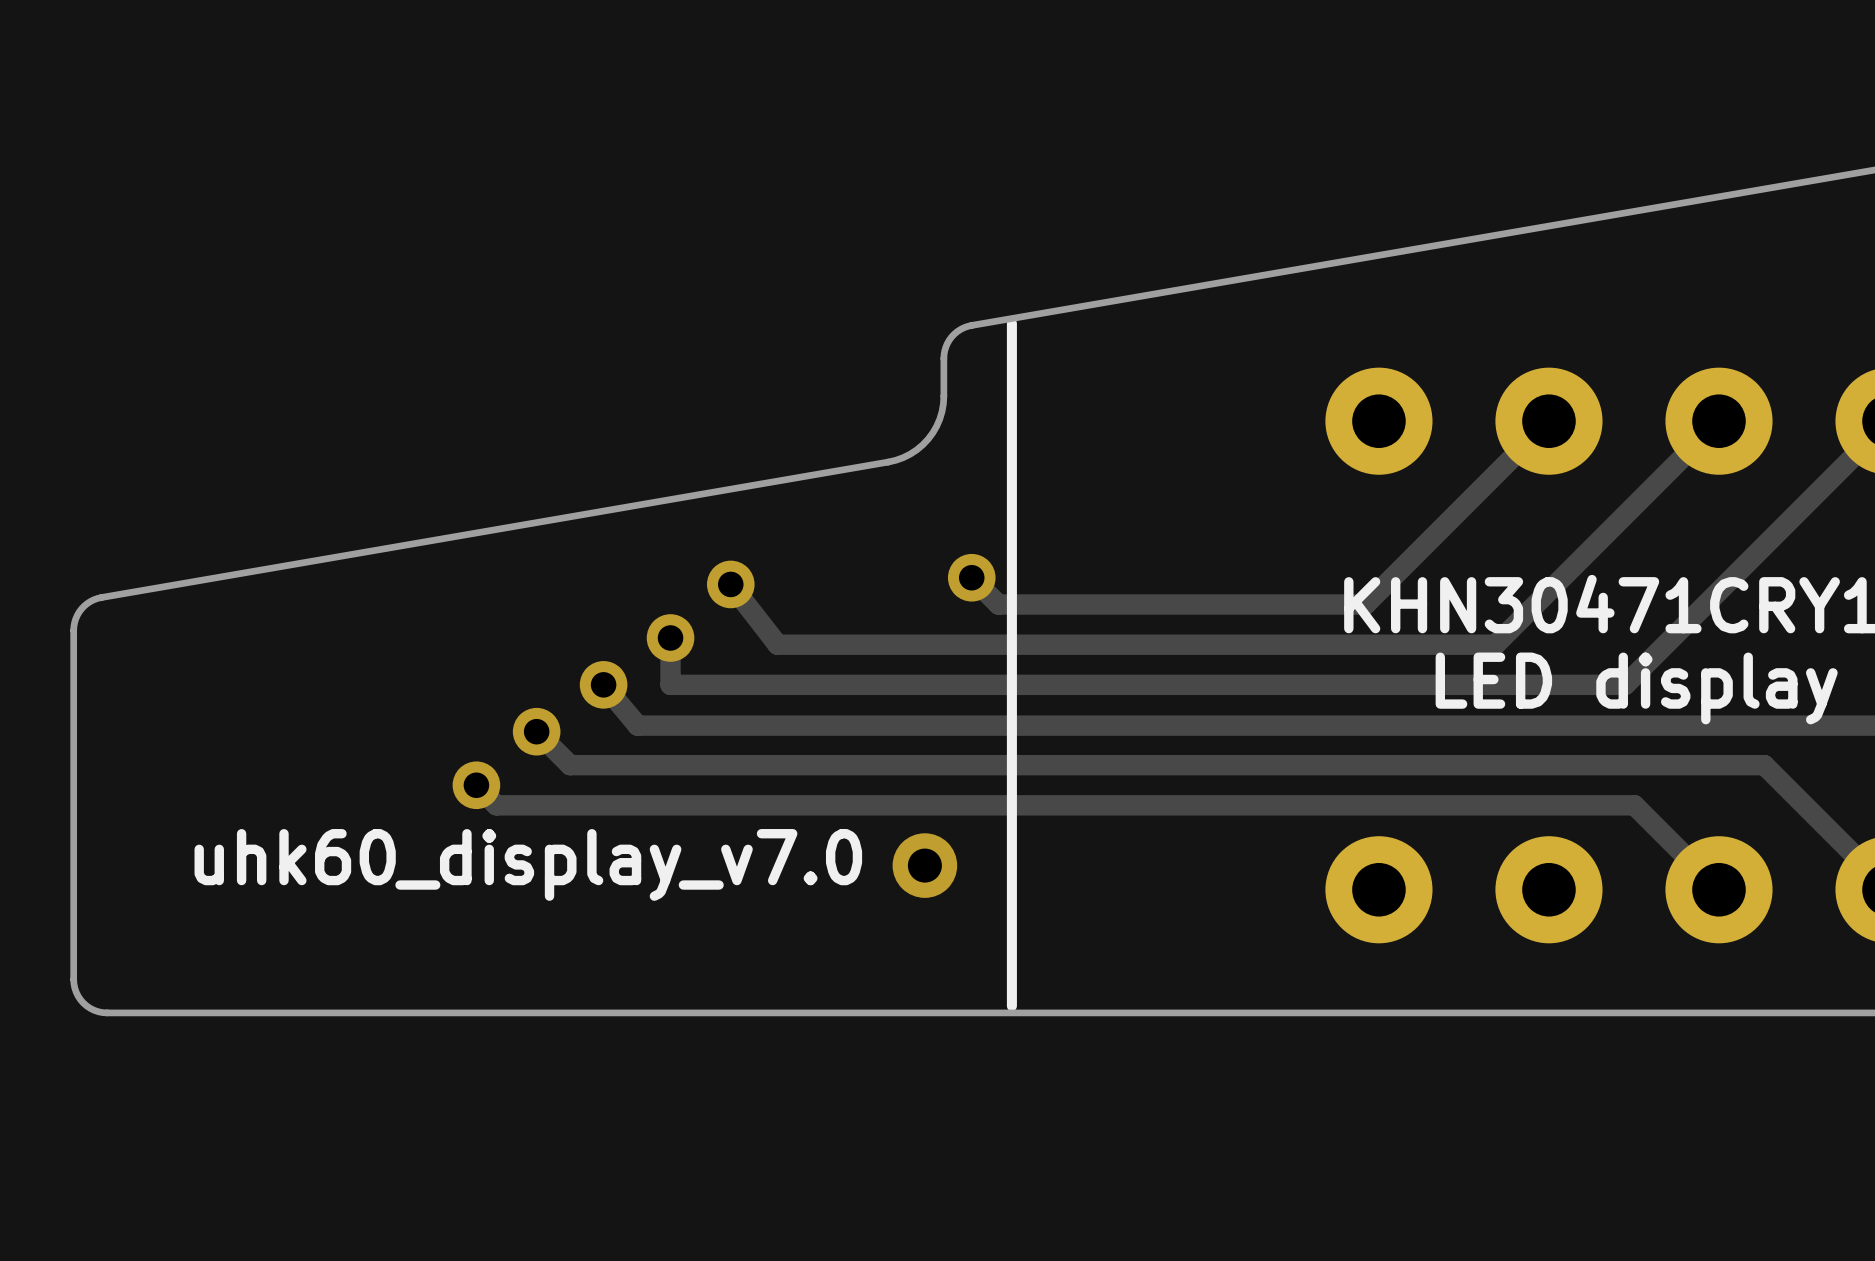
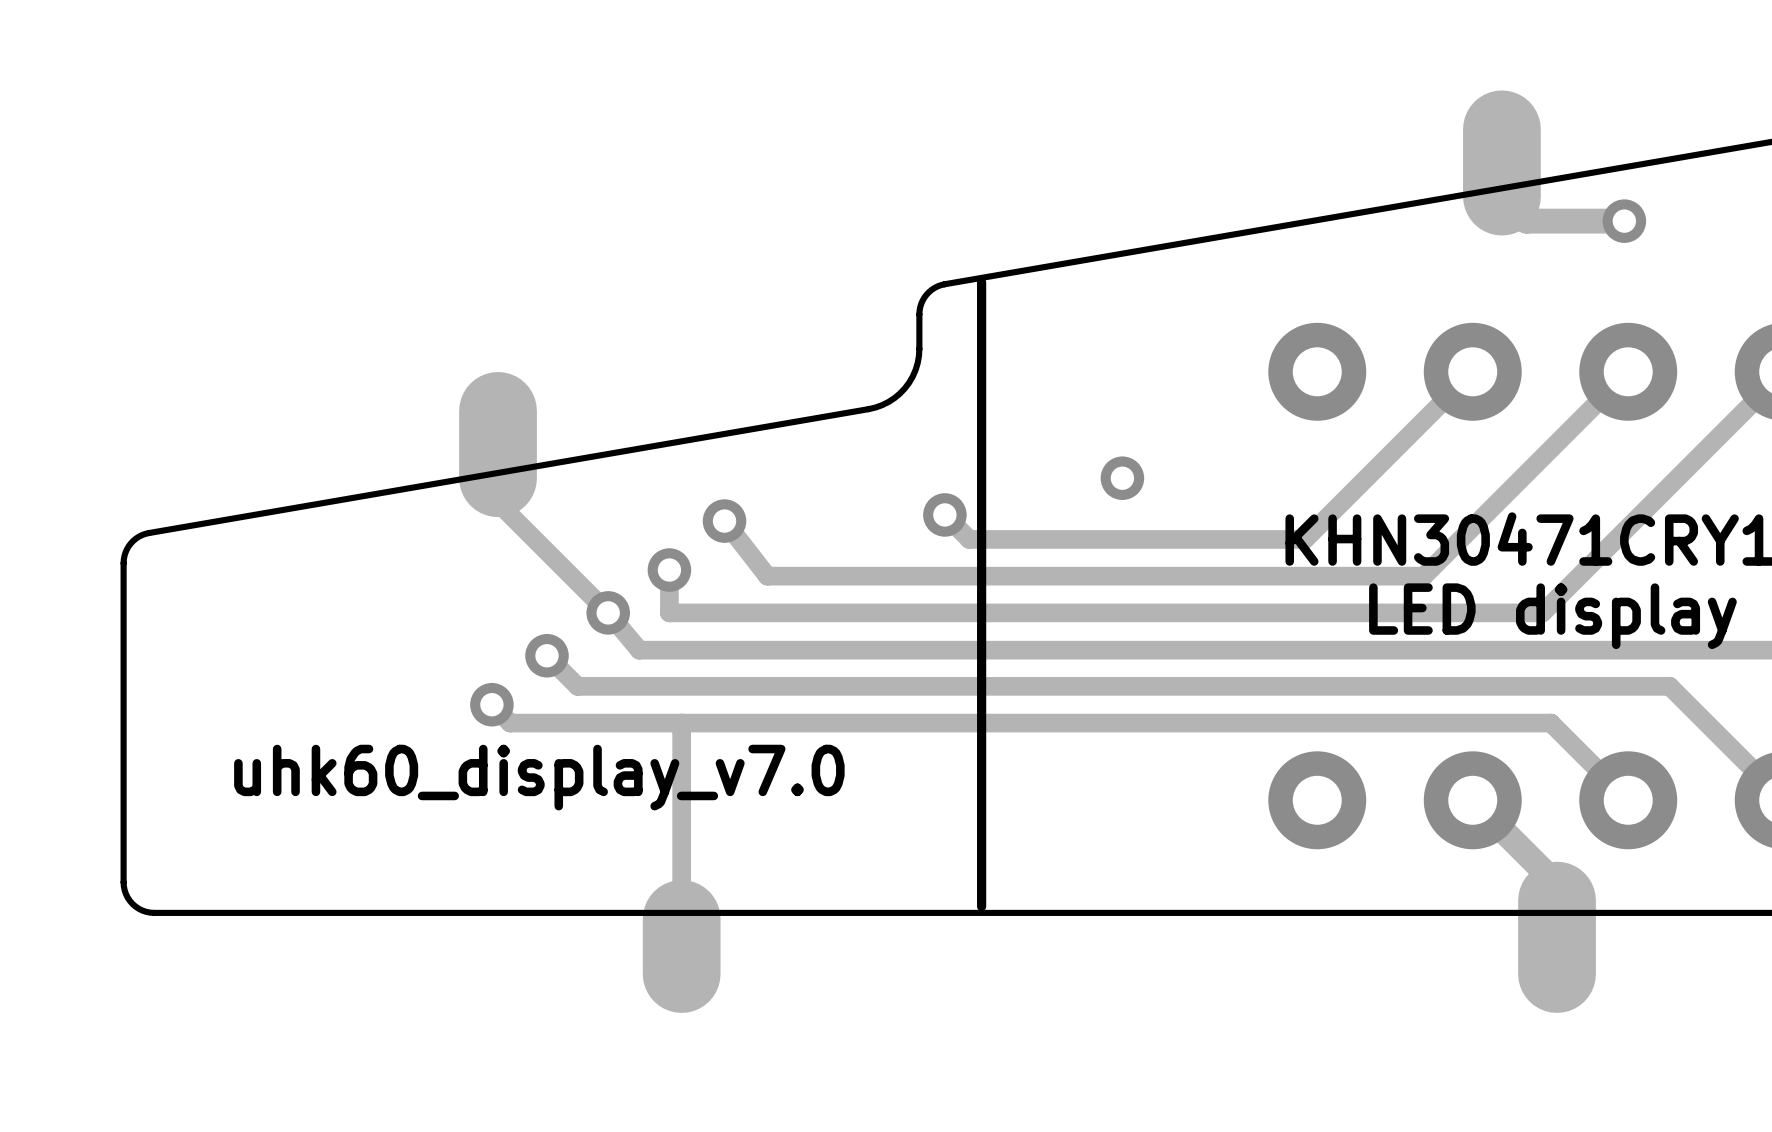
track: none -> (1501, 129) (1501, 196) (1526, 221) (1624, 221)
via: none -> (1624, 221)
track: none -> (498, 410) (498, 502) (608, 612)
via: none -> (1122, 478)
track: none -> (681, 723) (681, 974)
via: (924, 865) -> none
track: none -> (1472, 800) (1557, 884) (1557, 974)

